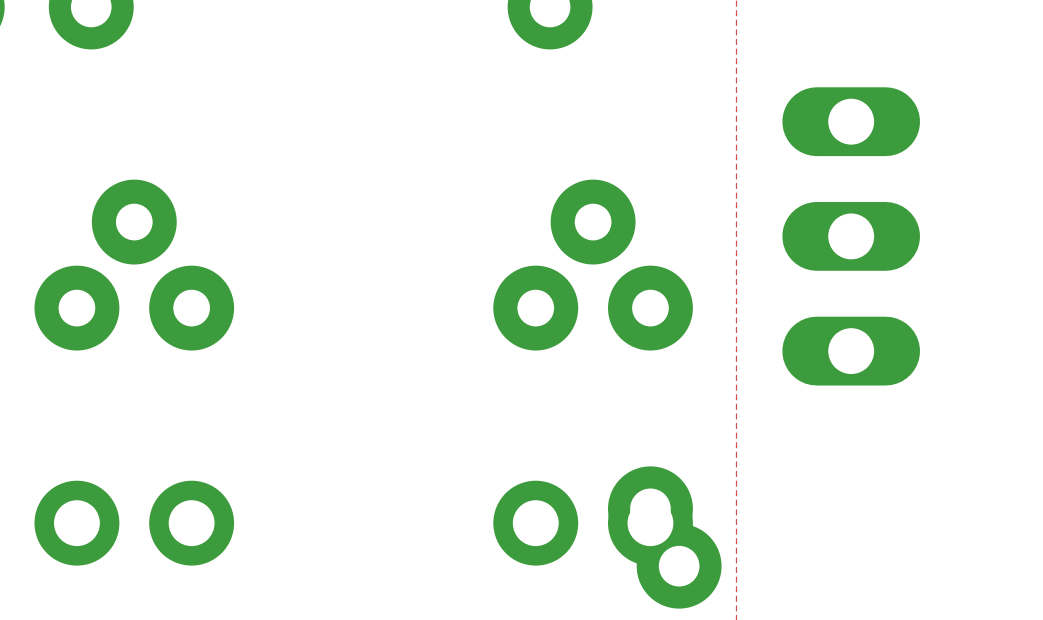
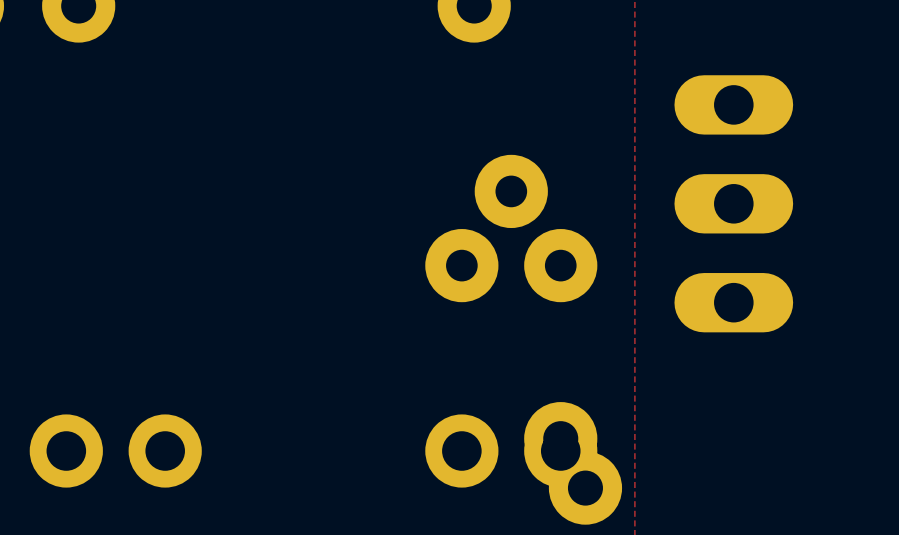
part: (134, 265) -> none

